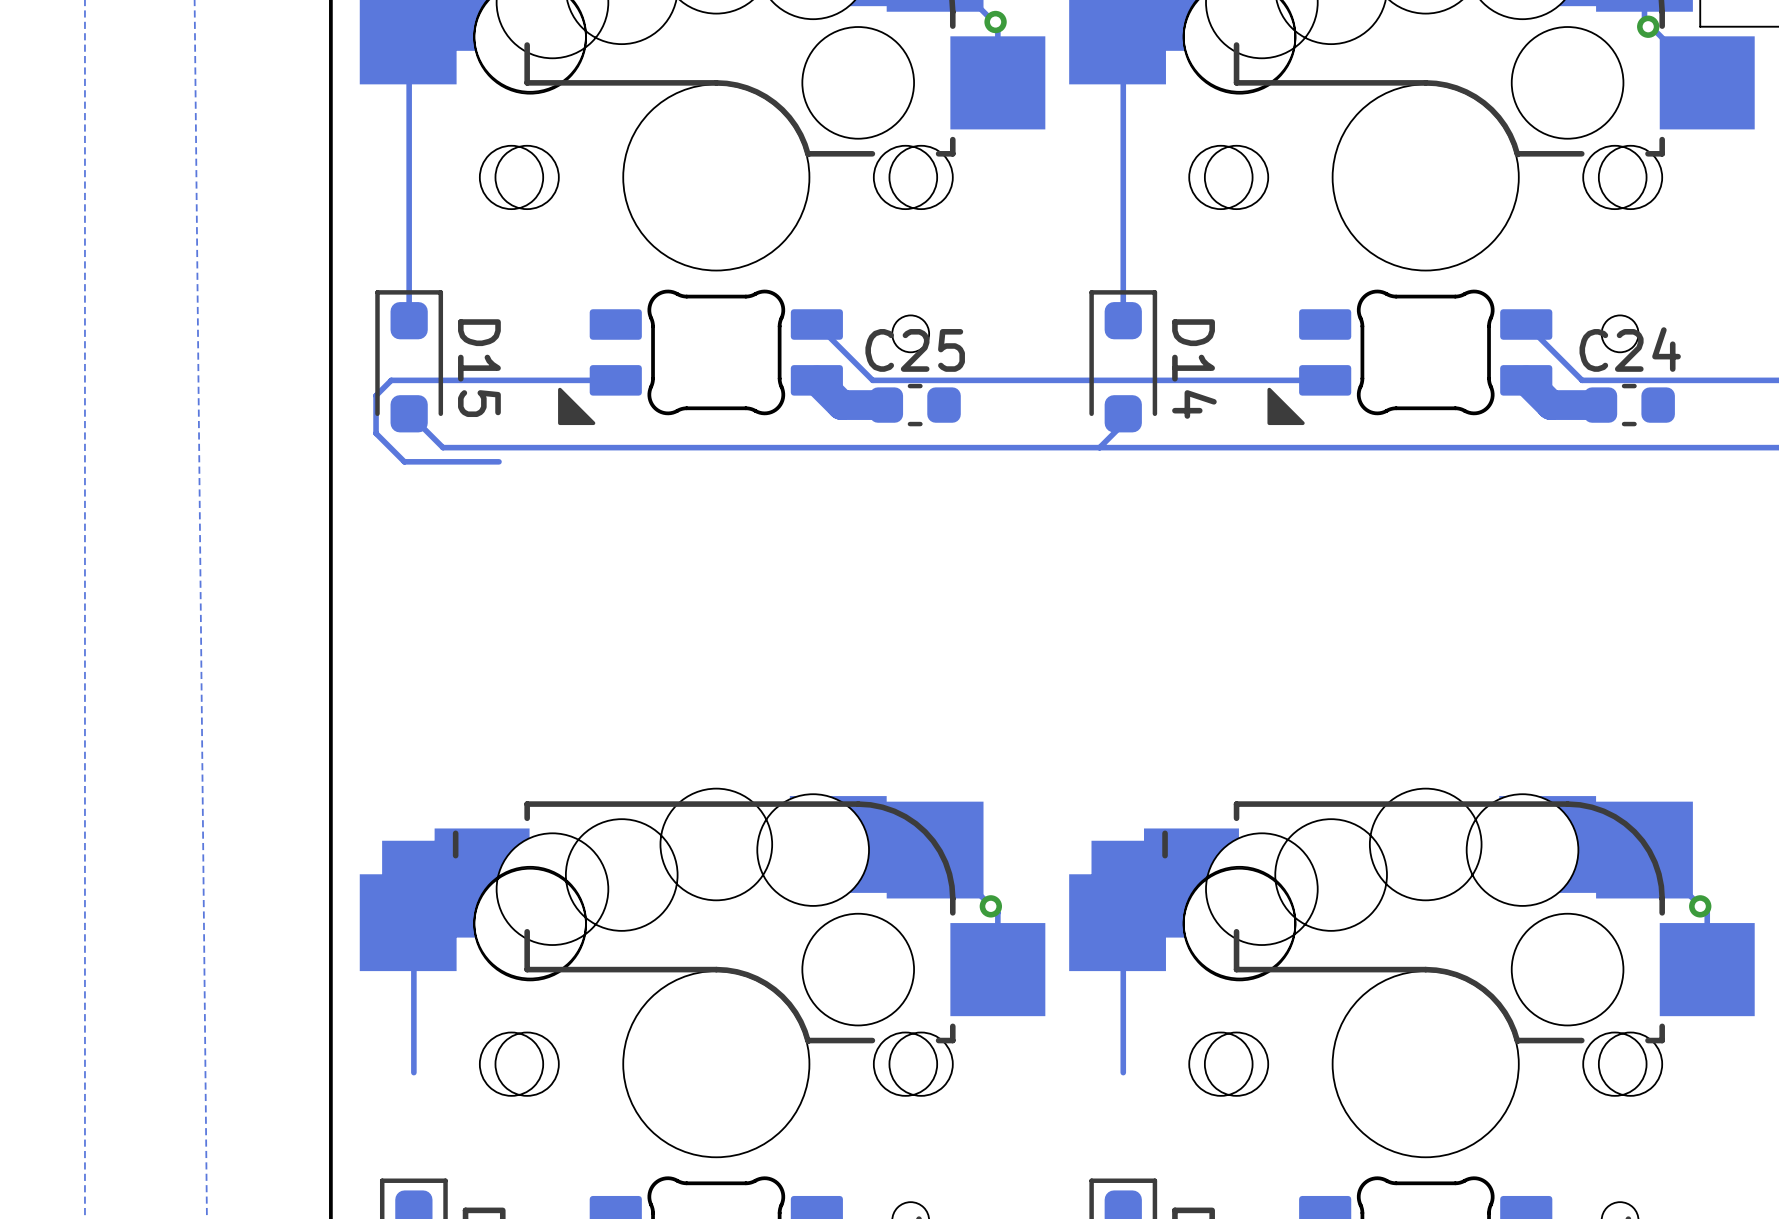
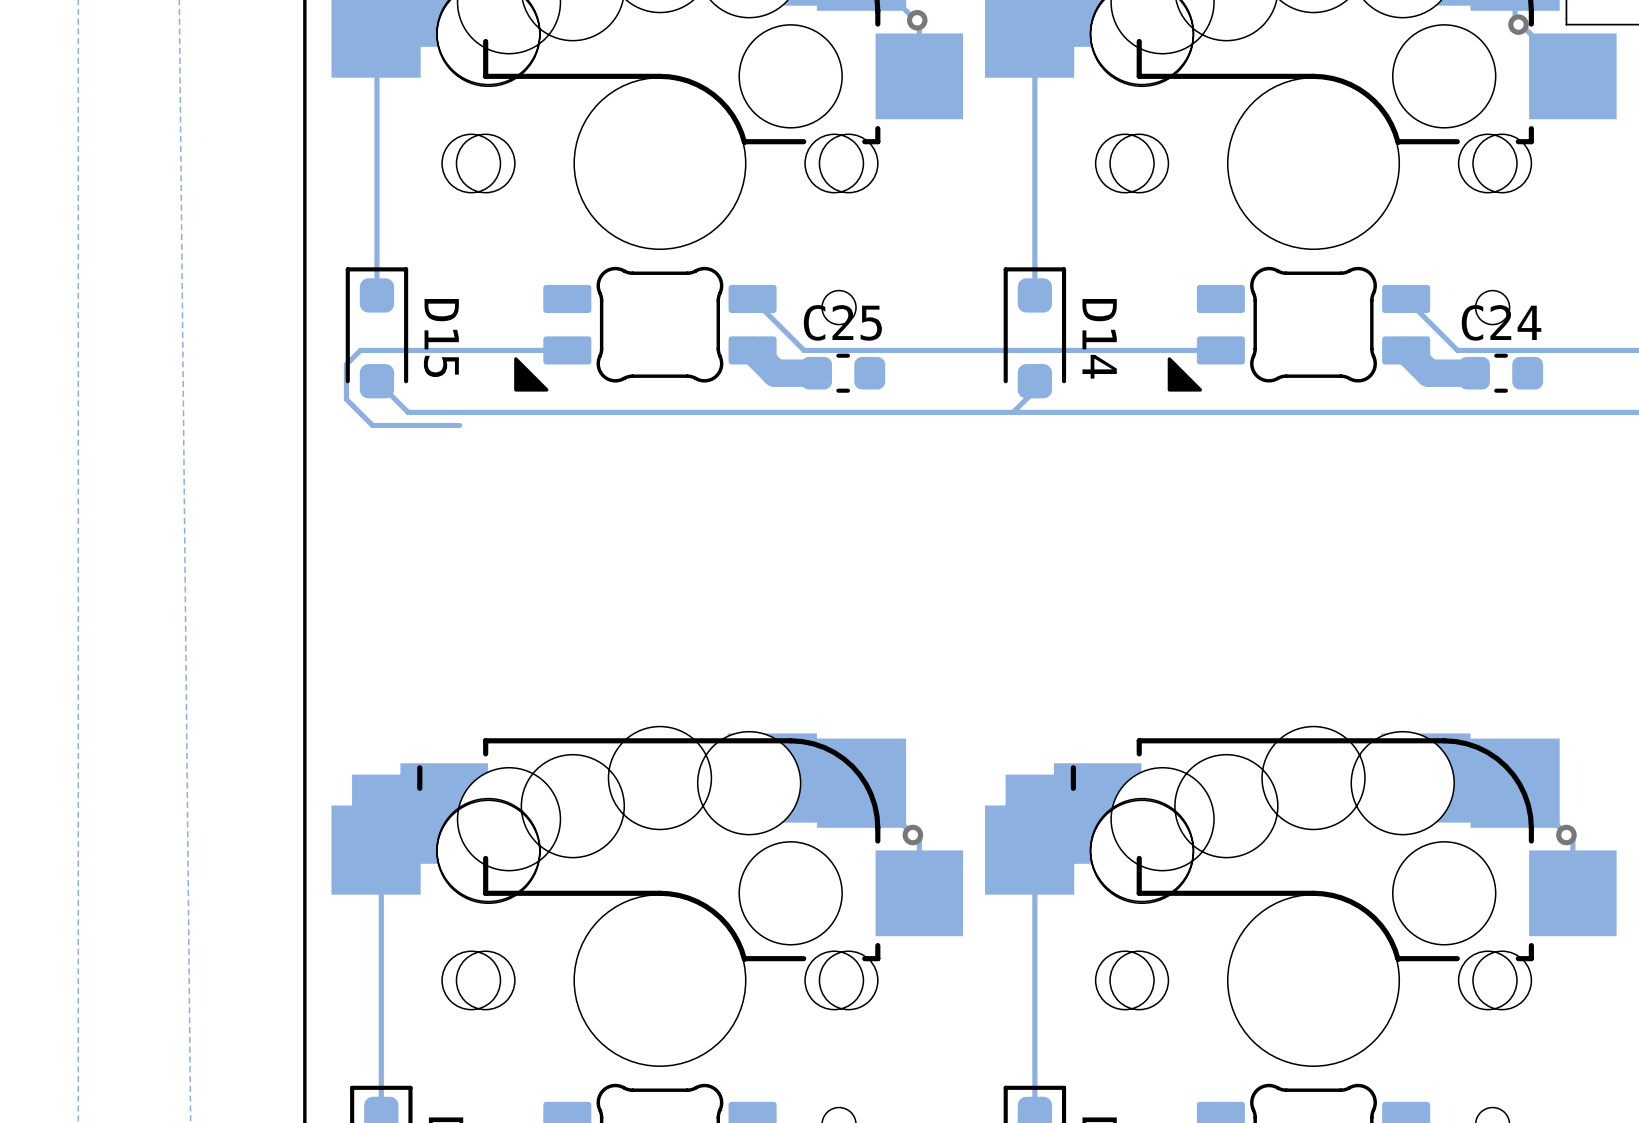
track: none -> (381, 988) (381, 1113)
track: none -> (1034, 988) (1034, 1113)

